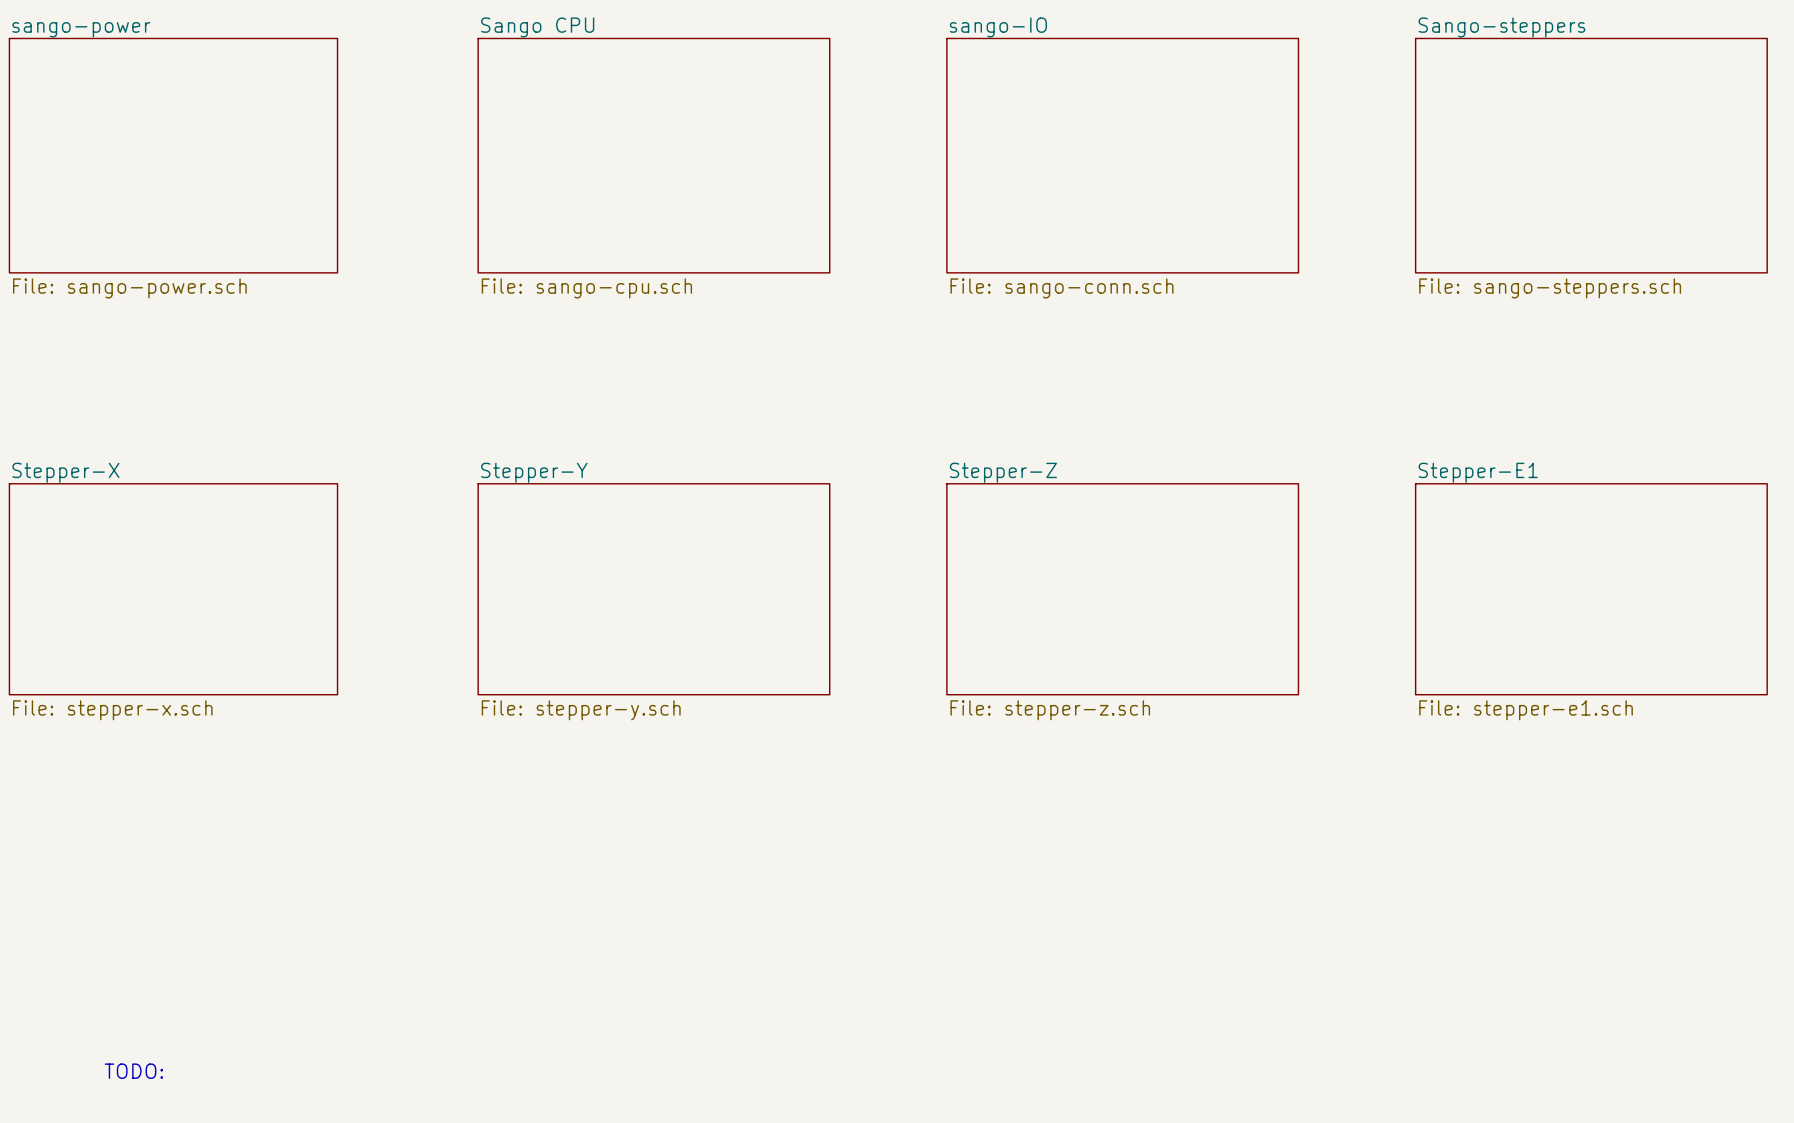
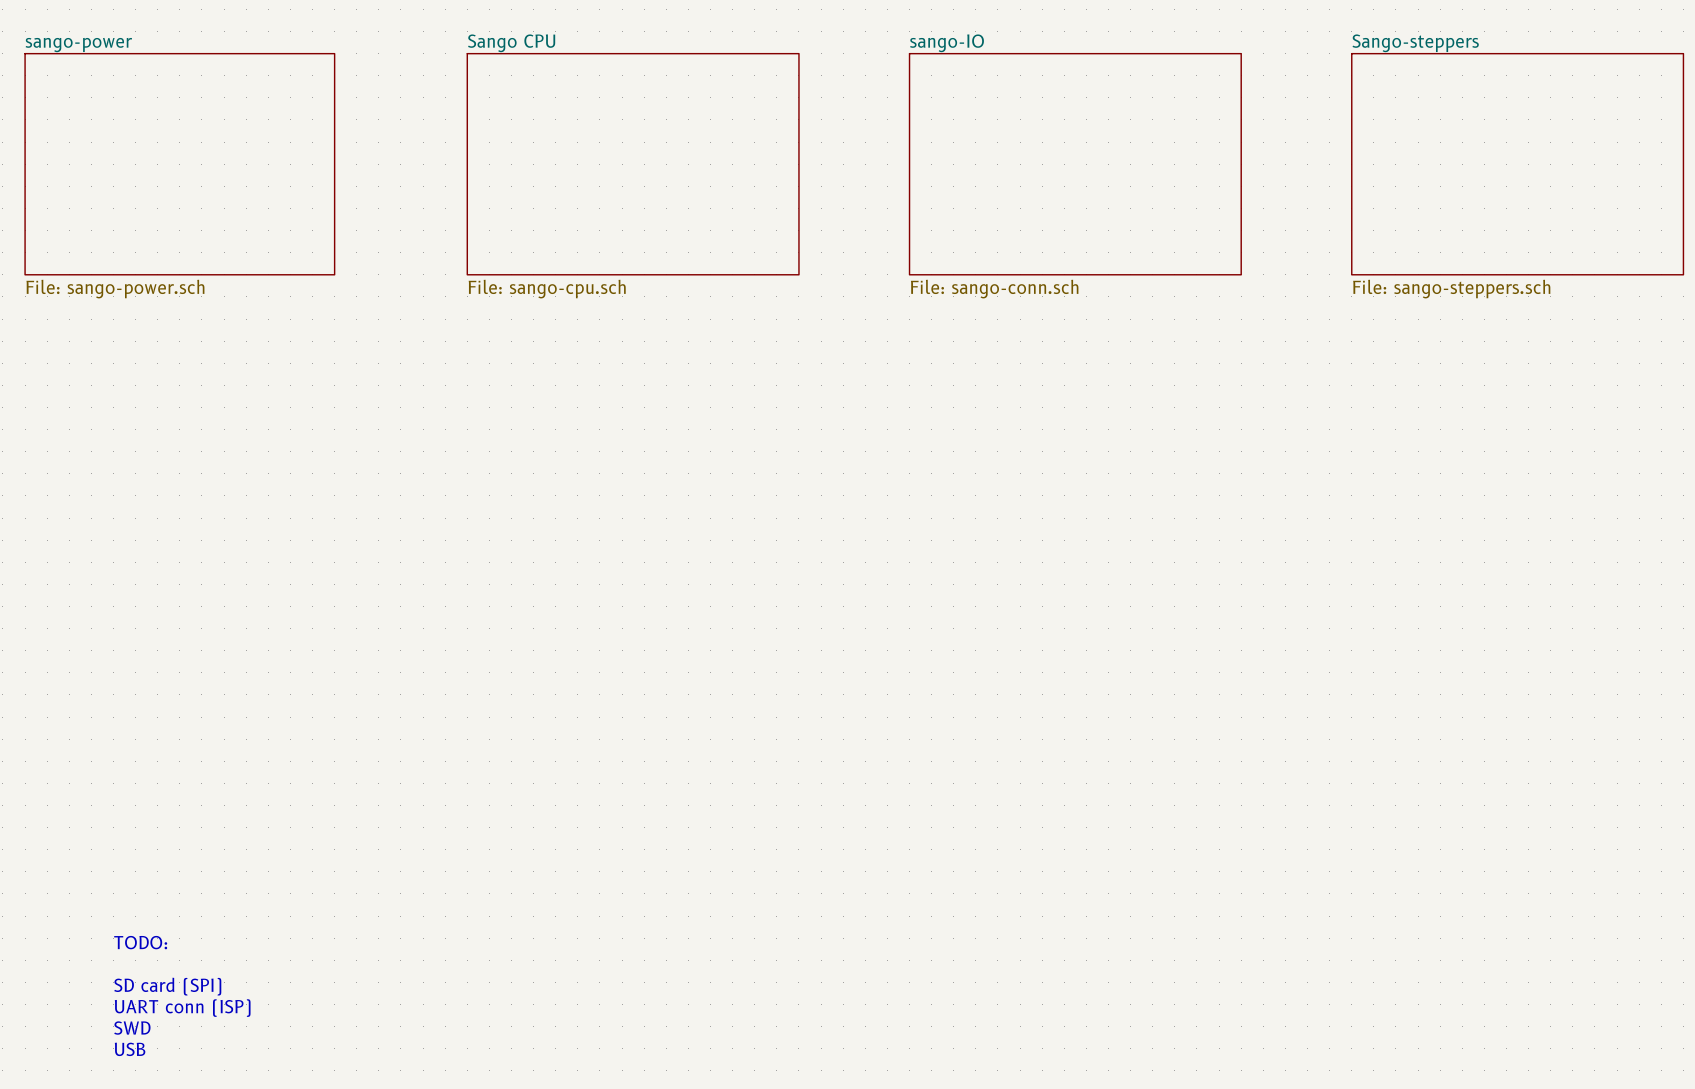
sheet Stepper-X: File: stepper-x.sch (173, 589) -> none
sheet Stepper-Y: File: stepper-y.sch (653, 589) -> none
sheet Stepper-Z: File: stepper-z.sch (1122, 589) -> none
sheet Stepper-E1: File: stepper-e1.sch (1591, 589) -> none
text: none -> TODO: (140, 942)
text: none -> SD card (SPI) (167, 986)
text: none -> UART conn (ISP) (182, 1008)
text: TODO: (133, 1071) -> SWD (132, 1028)
text: none -> USB (130, 1049)

